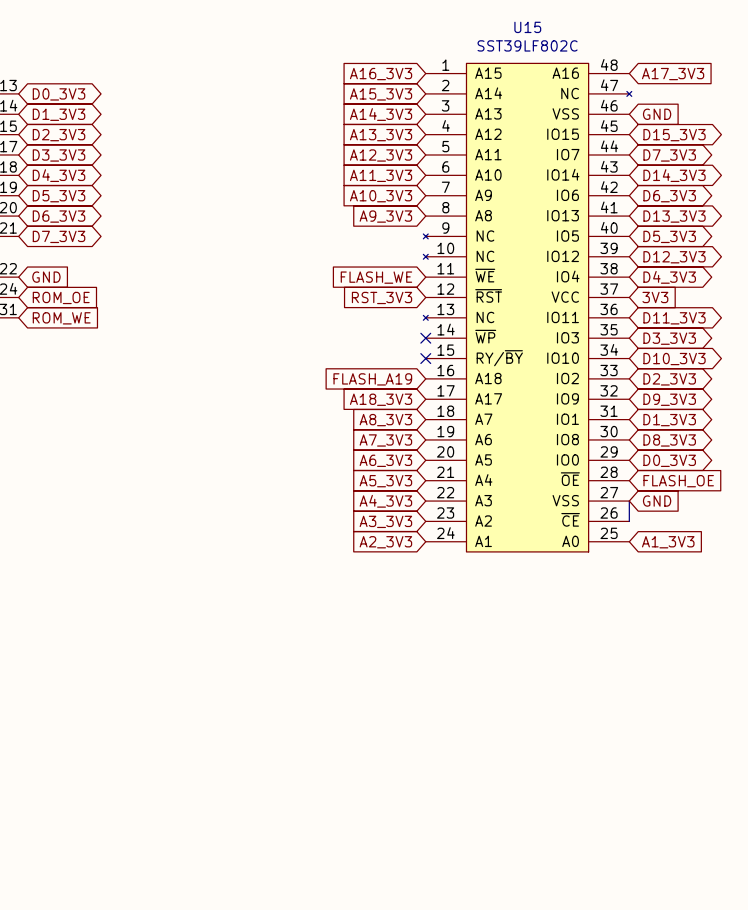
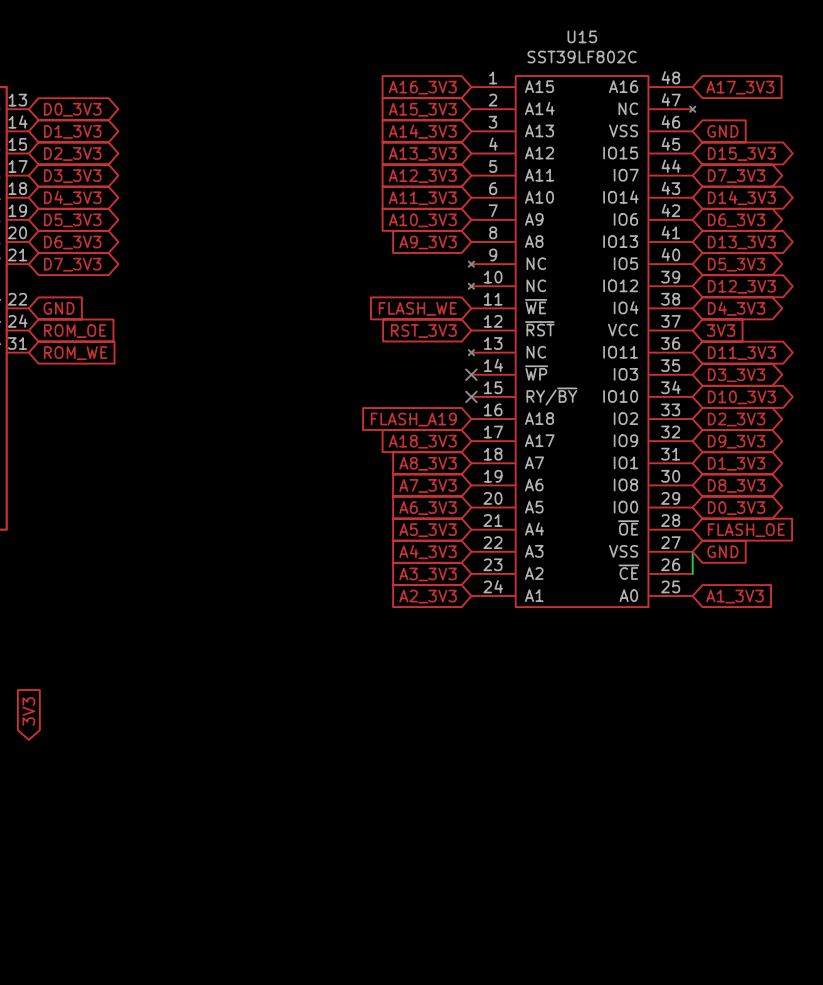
global label: none -> 3V3 (28, 711)

